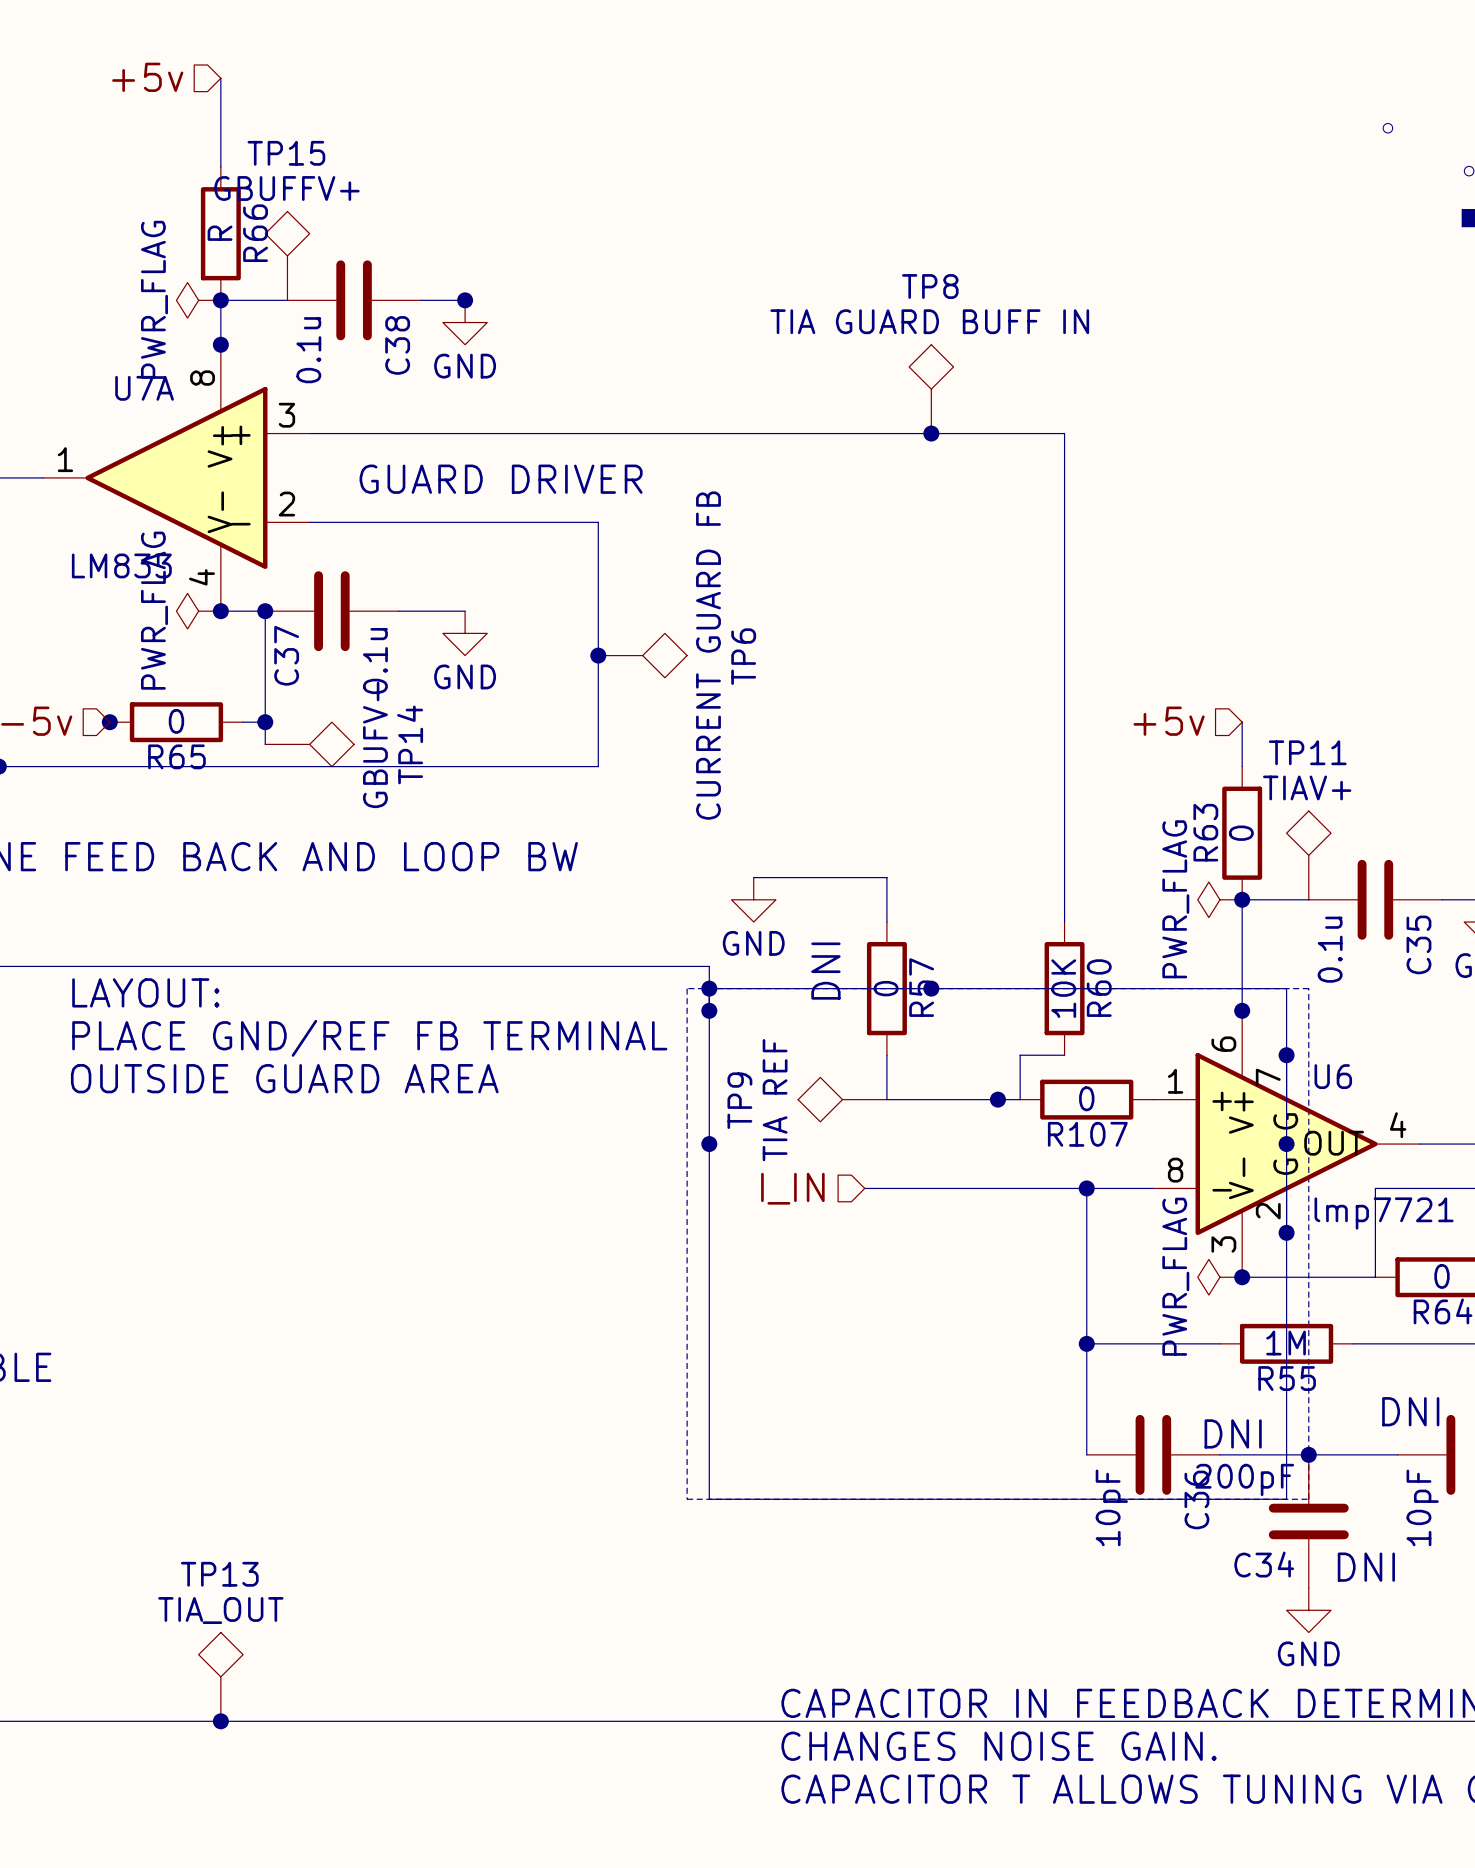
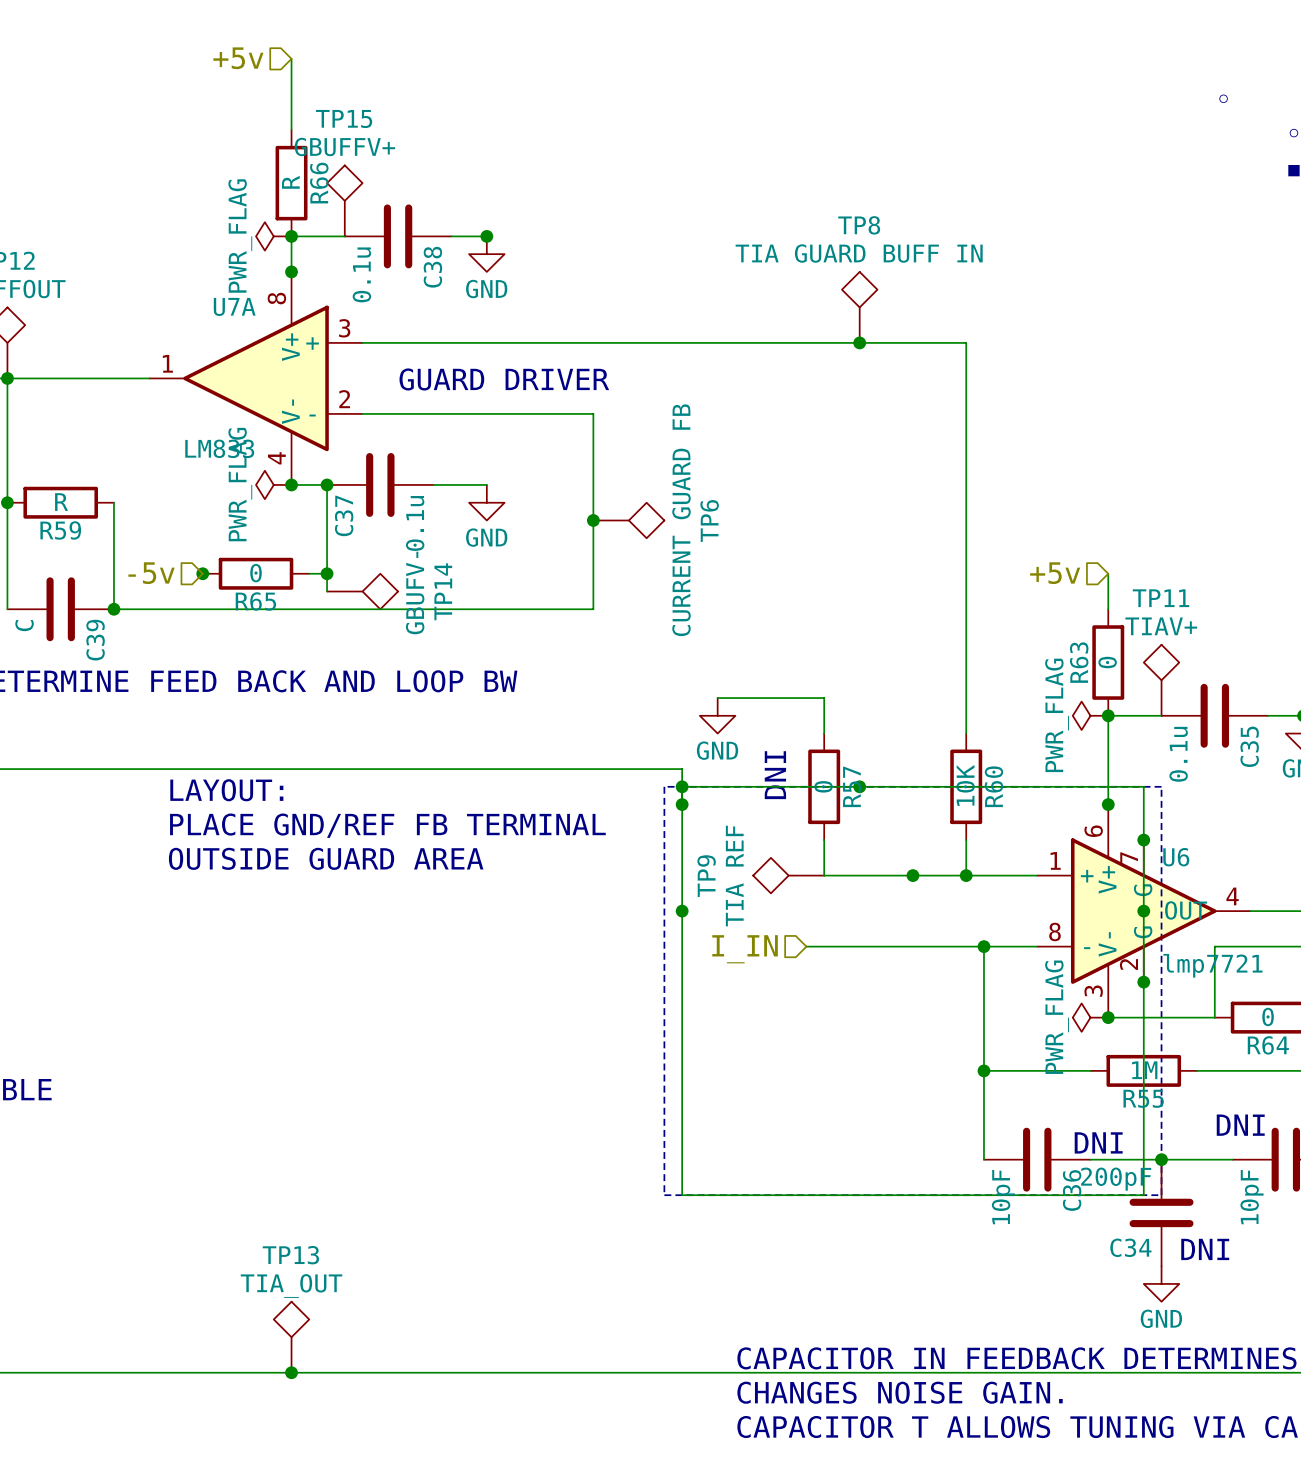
wire: (1064, 1055) (1020, 1055) (1020, 1099) -> (966, 840) (966, 875)
wire: none -> (930, 875) (1037, 875)
junction: none -> (966, 875)
R107: 0 (1086, 1099) -> none

